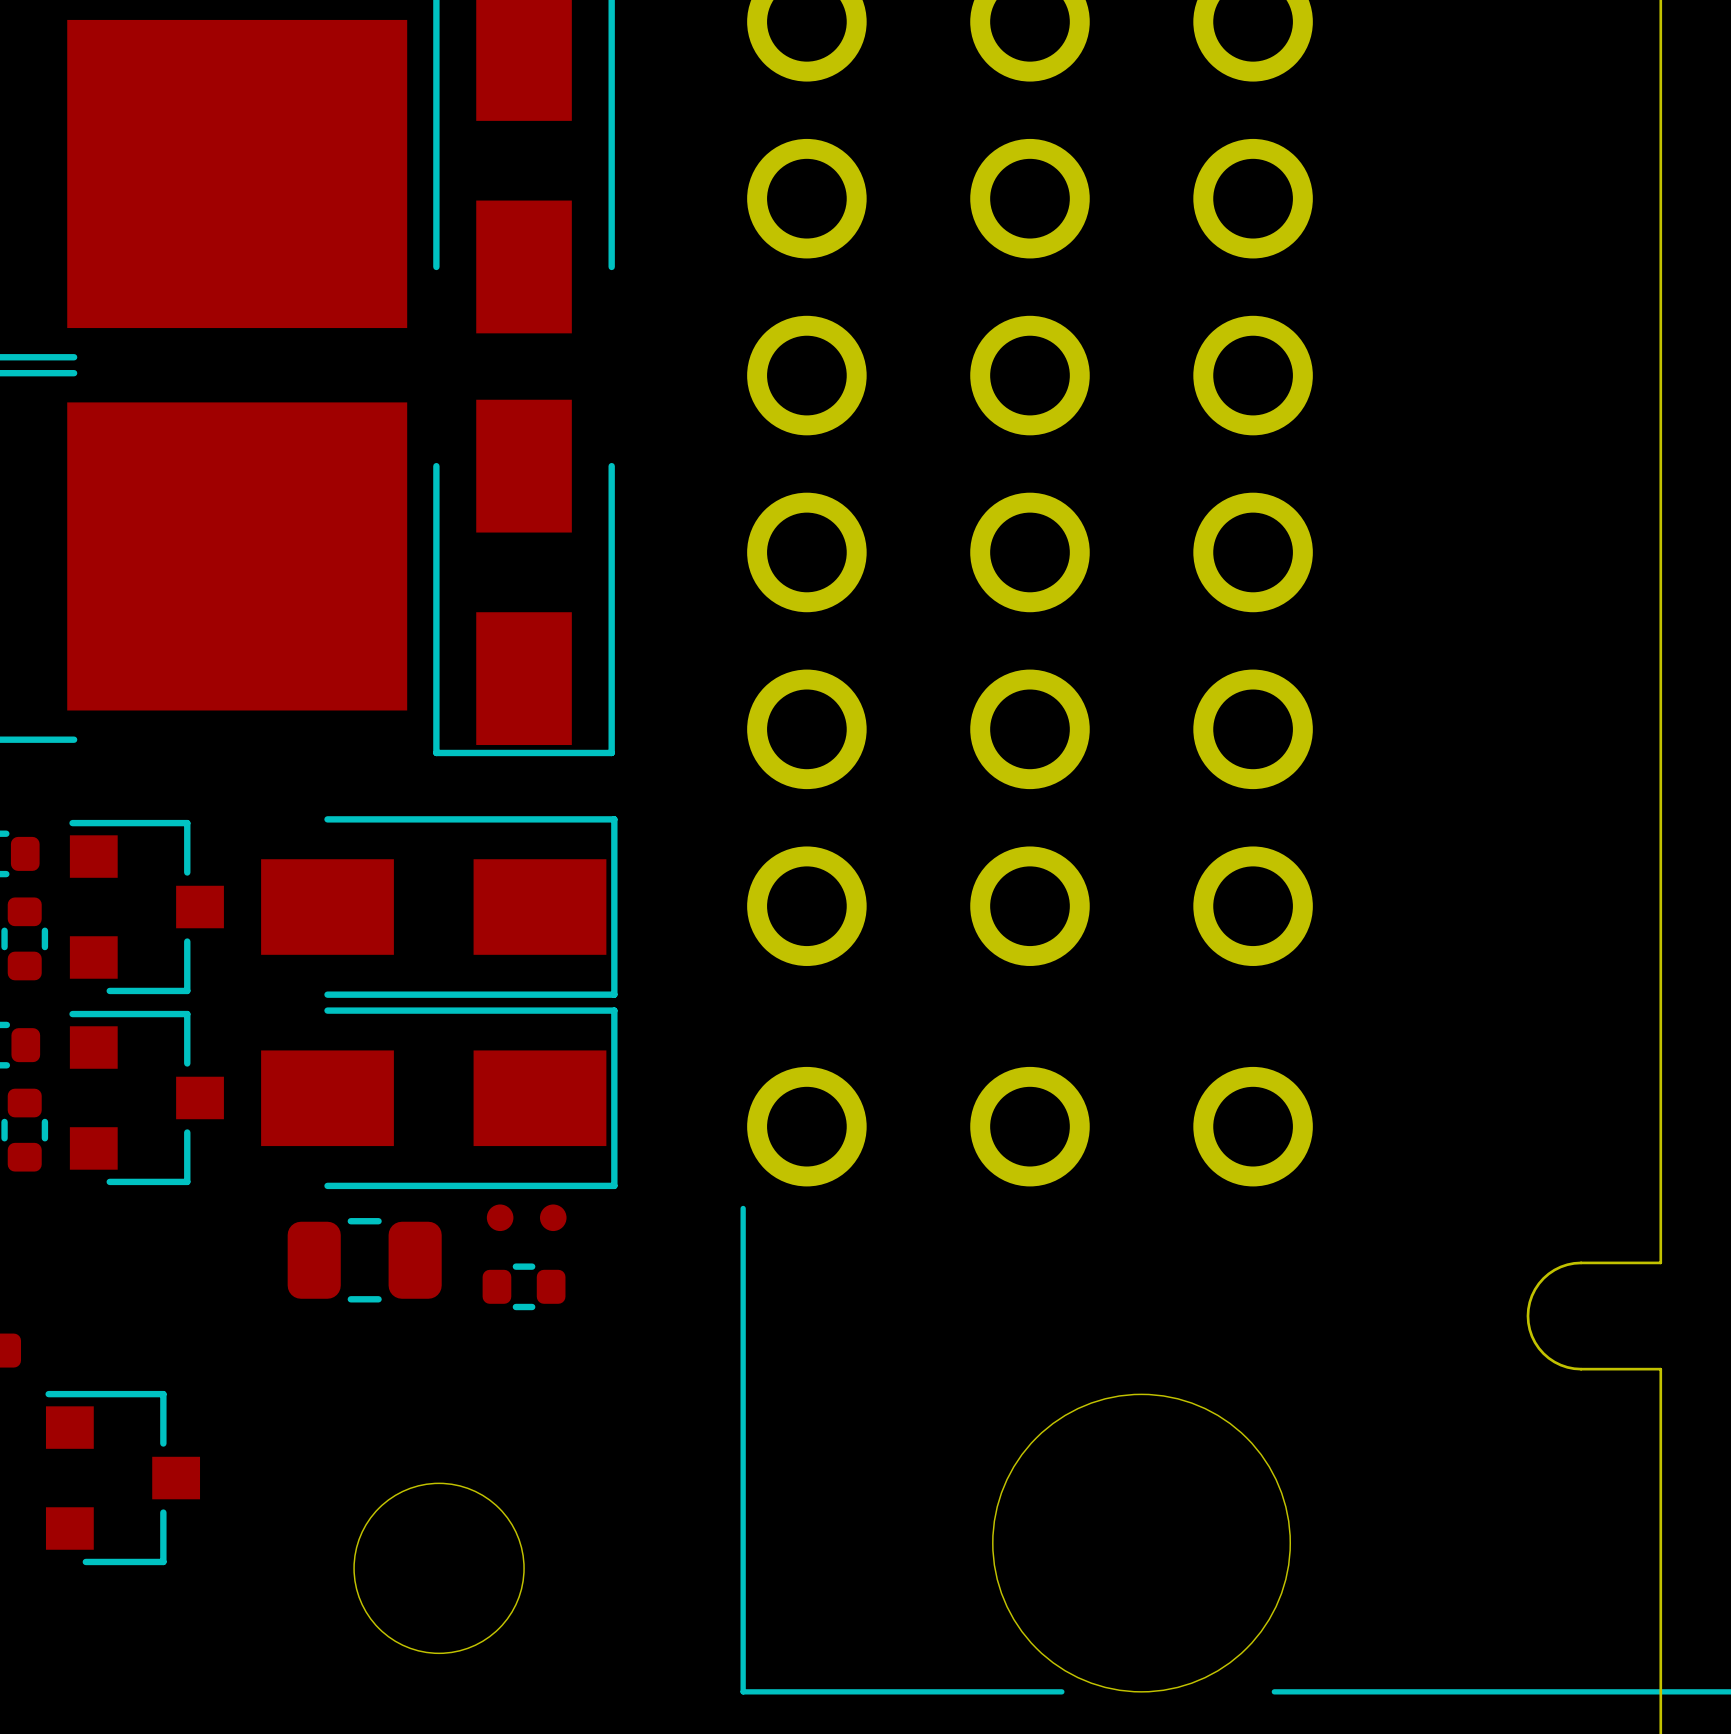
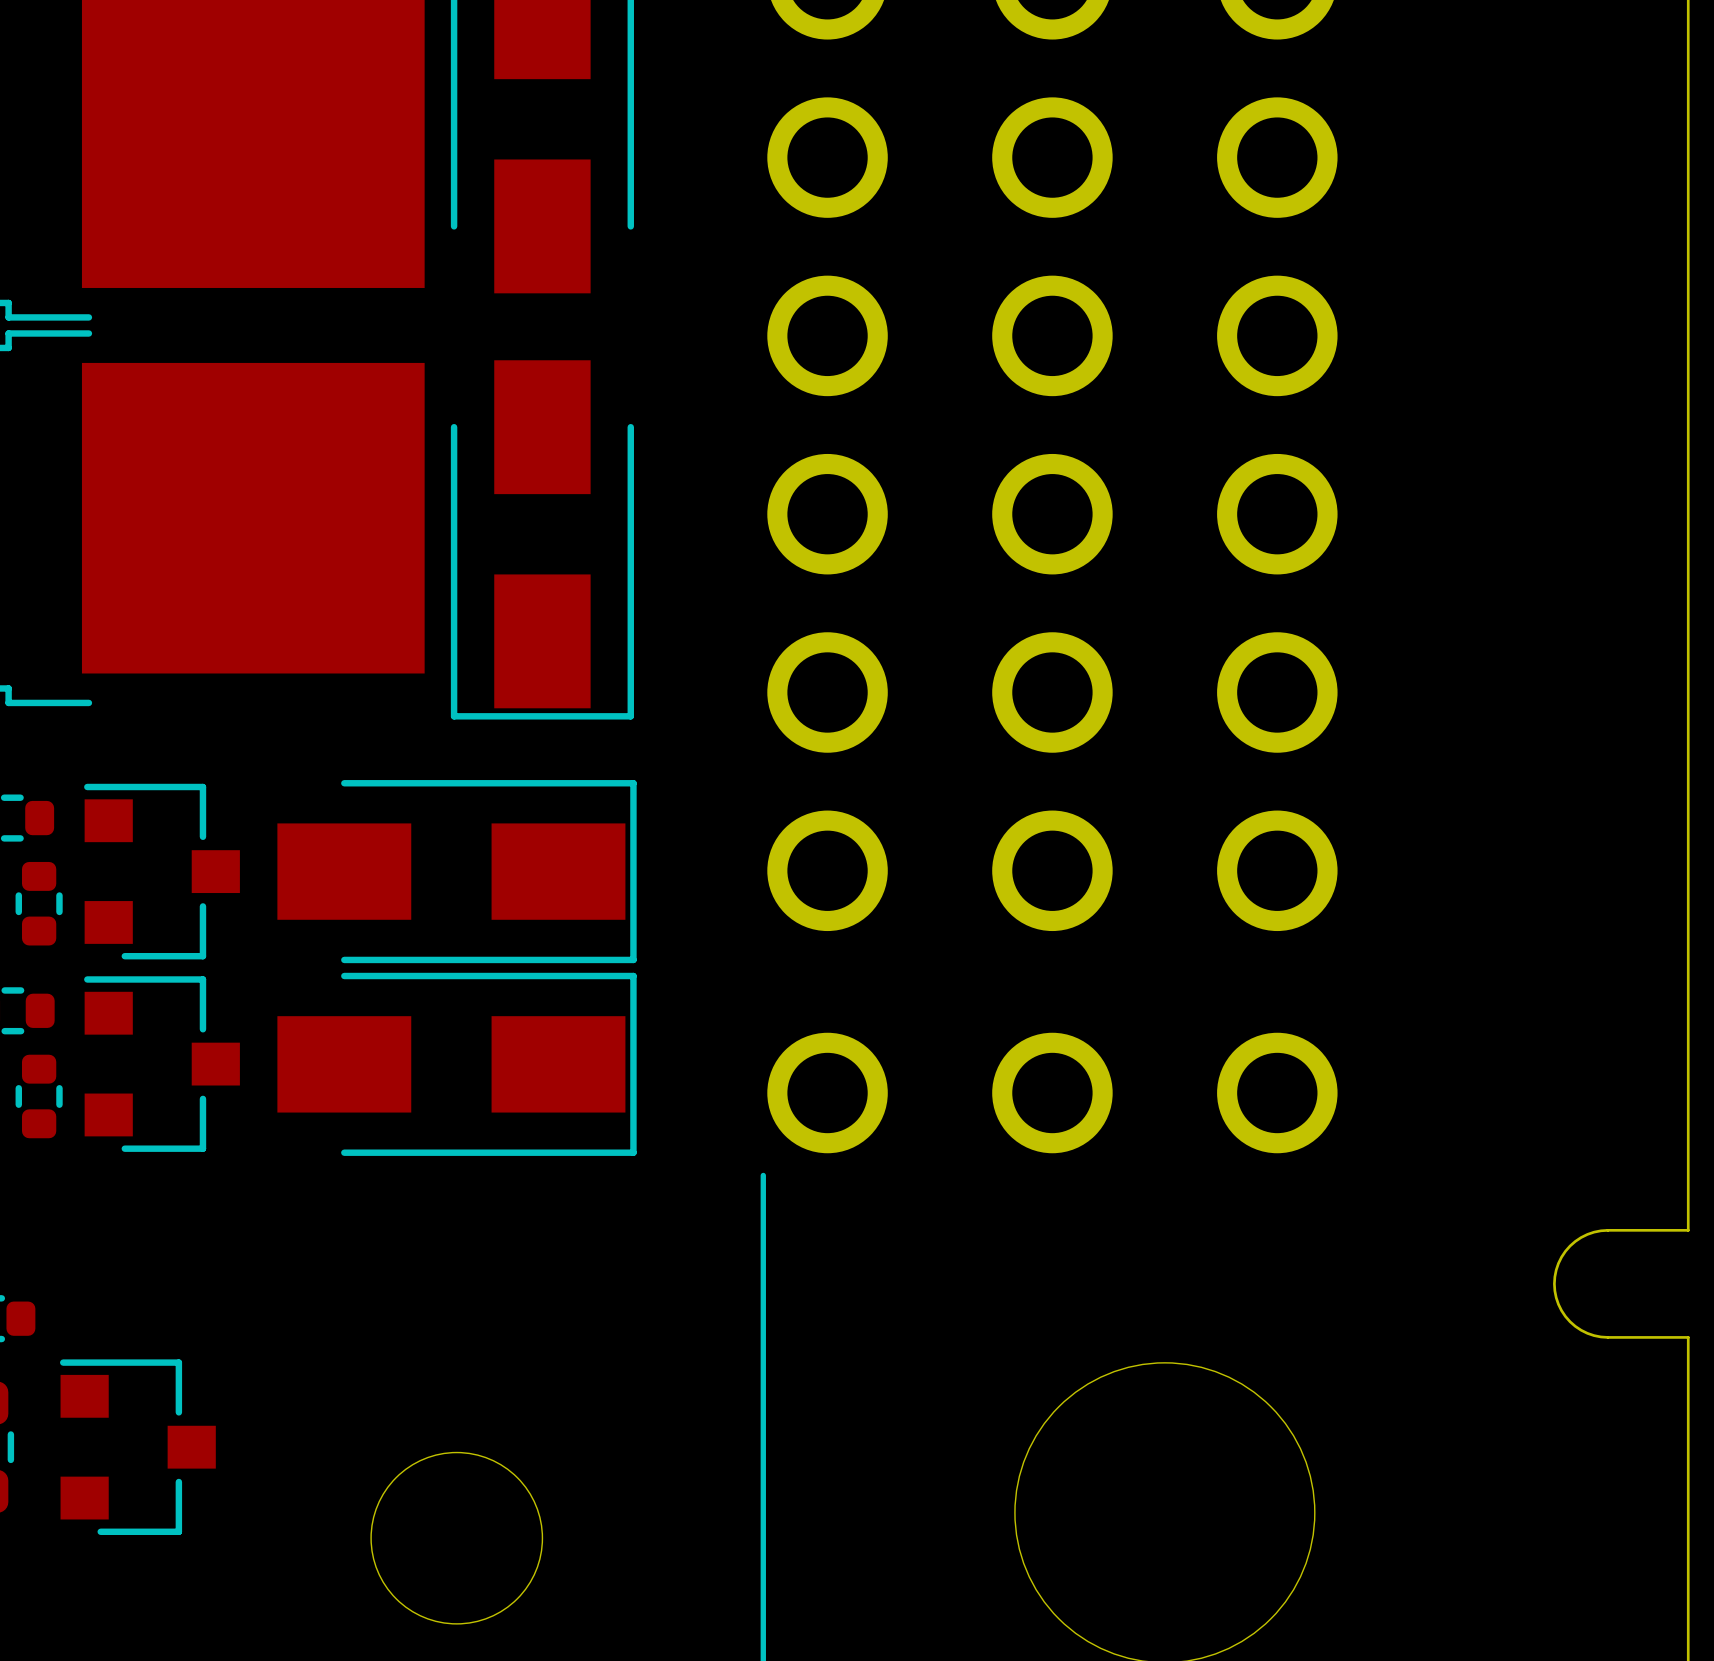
part: (526, 1217) -> none
part: (364, 1260) -> none
part: (524, 1286) -> none

